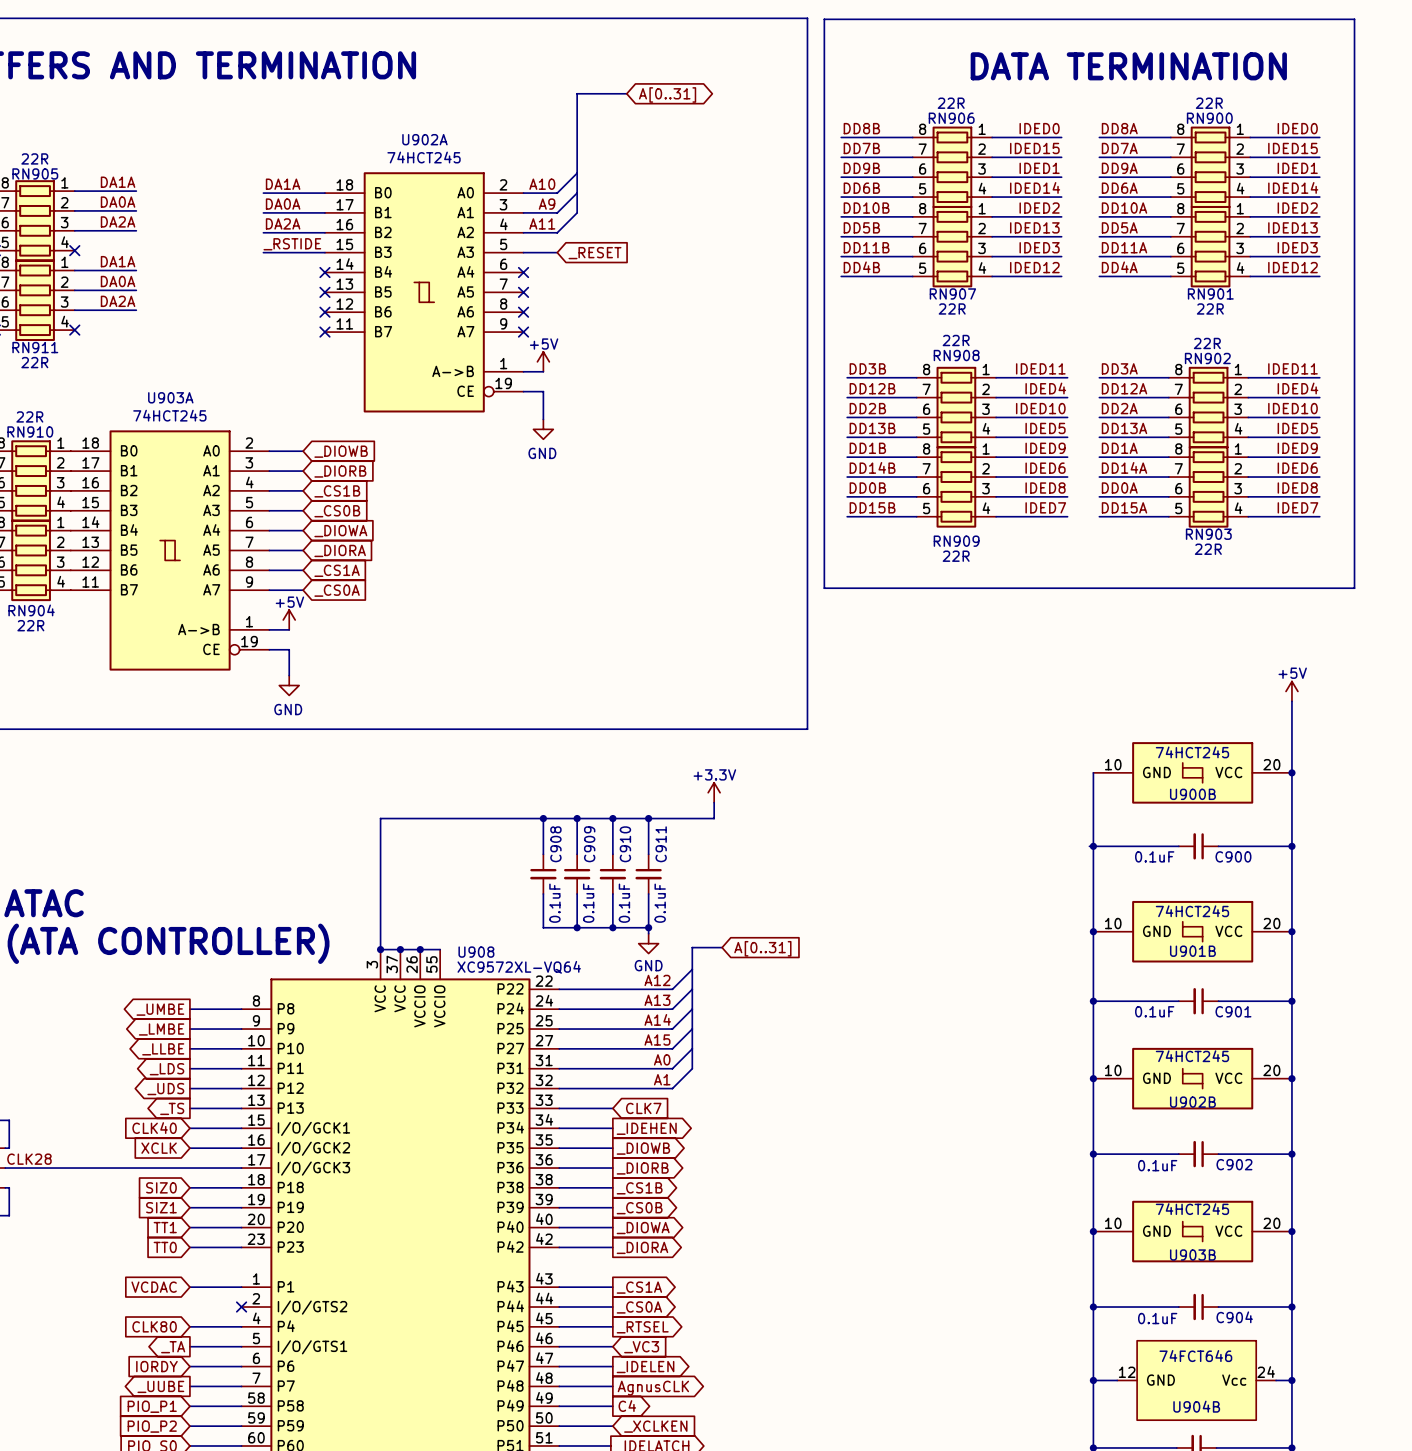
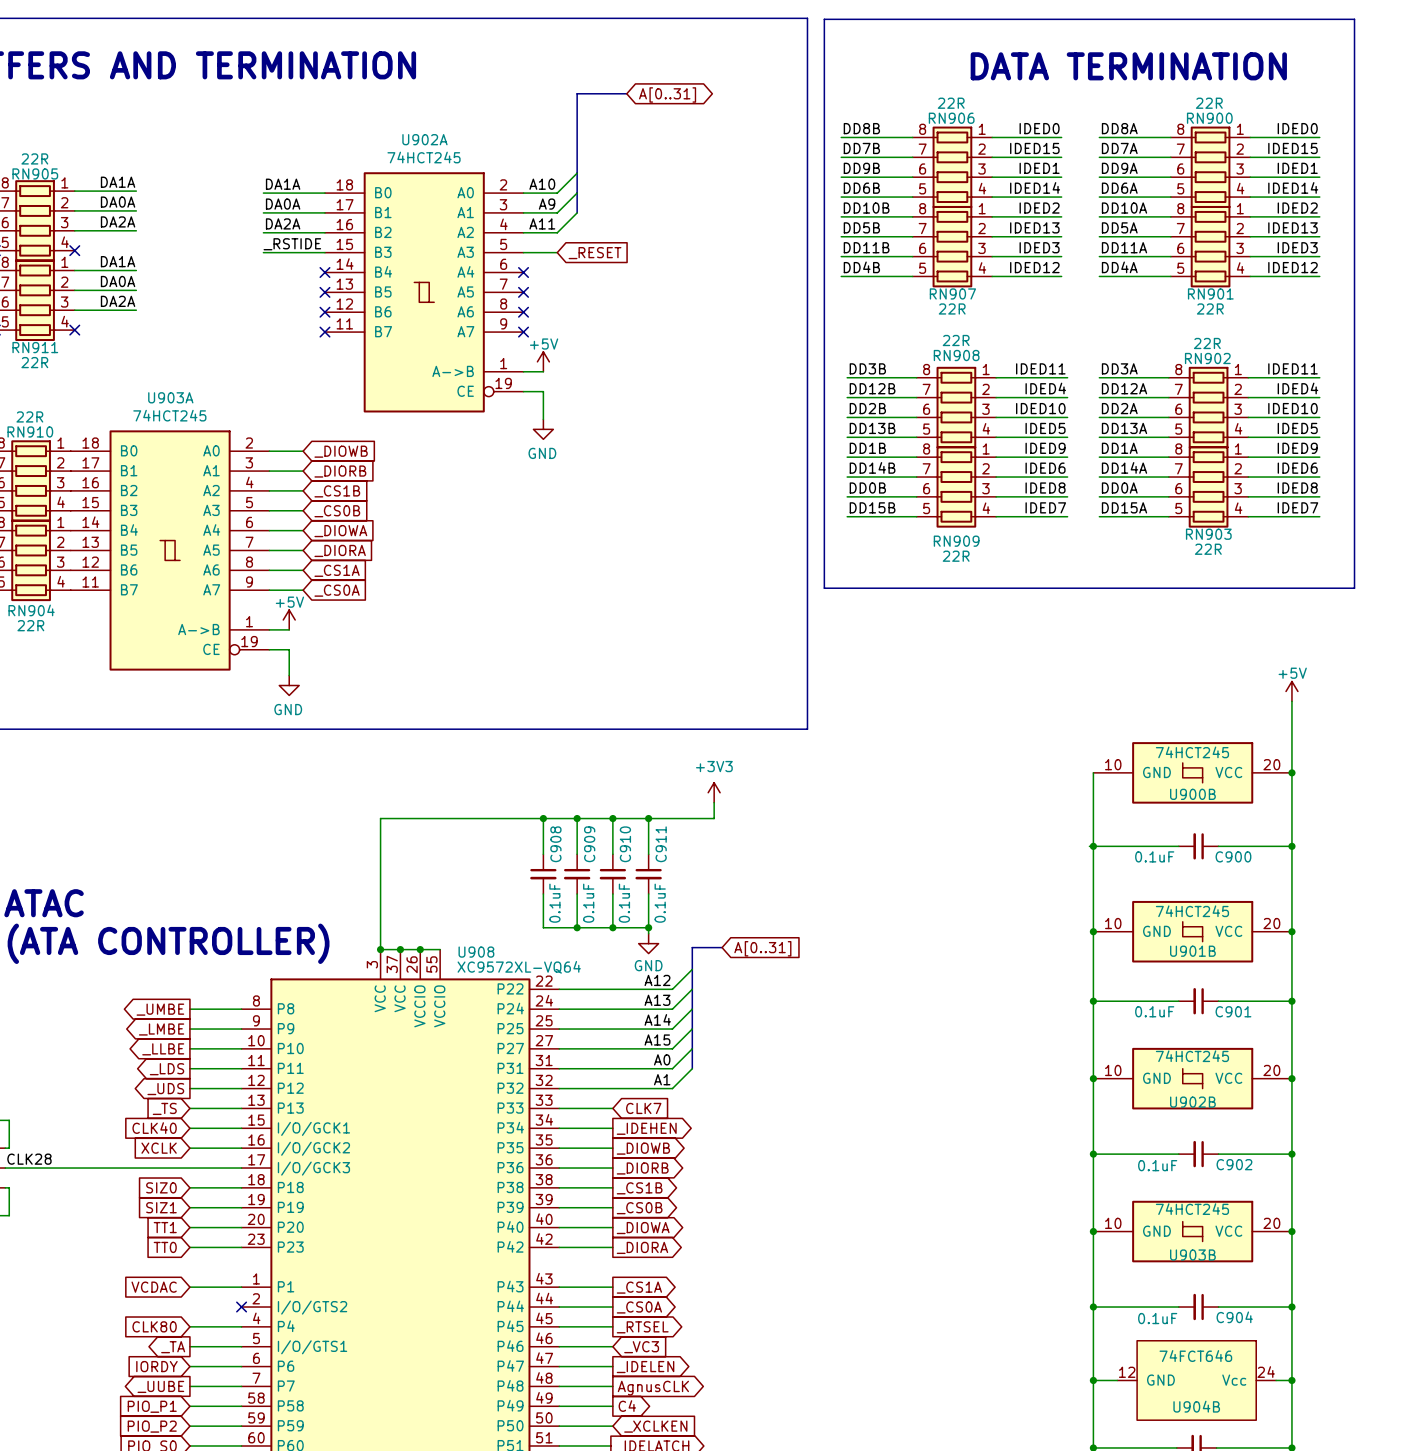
power symbol: +3.3V (714, 792) -> +3V3 (714, 792)
global label shape: output (172, 1108) -> input (164, 1108)

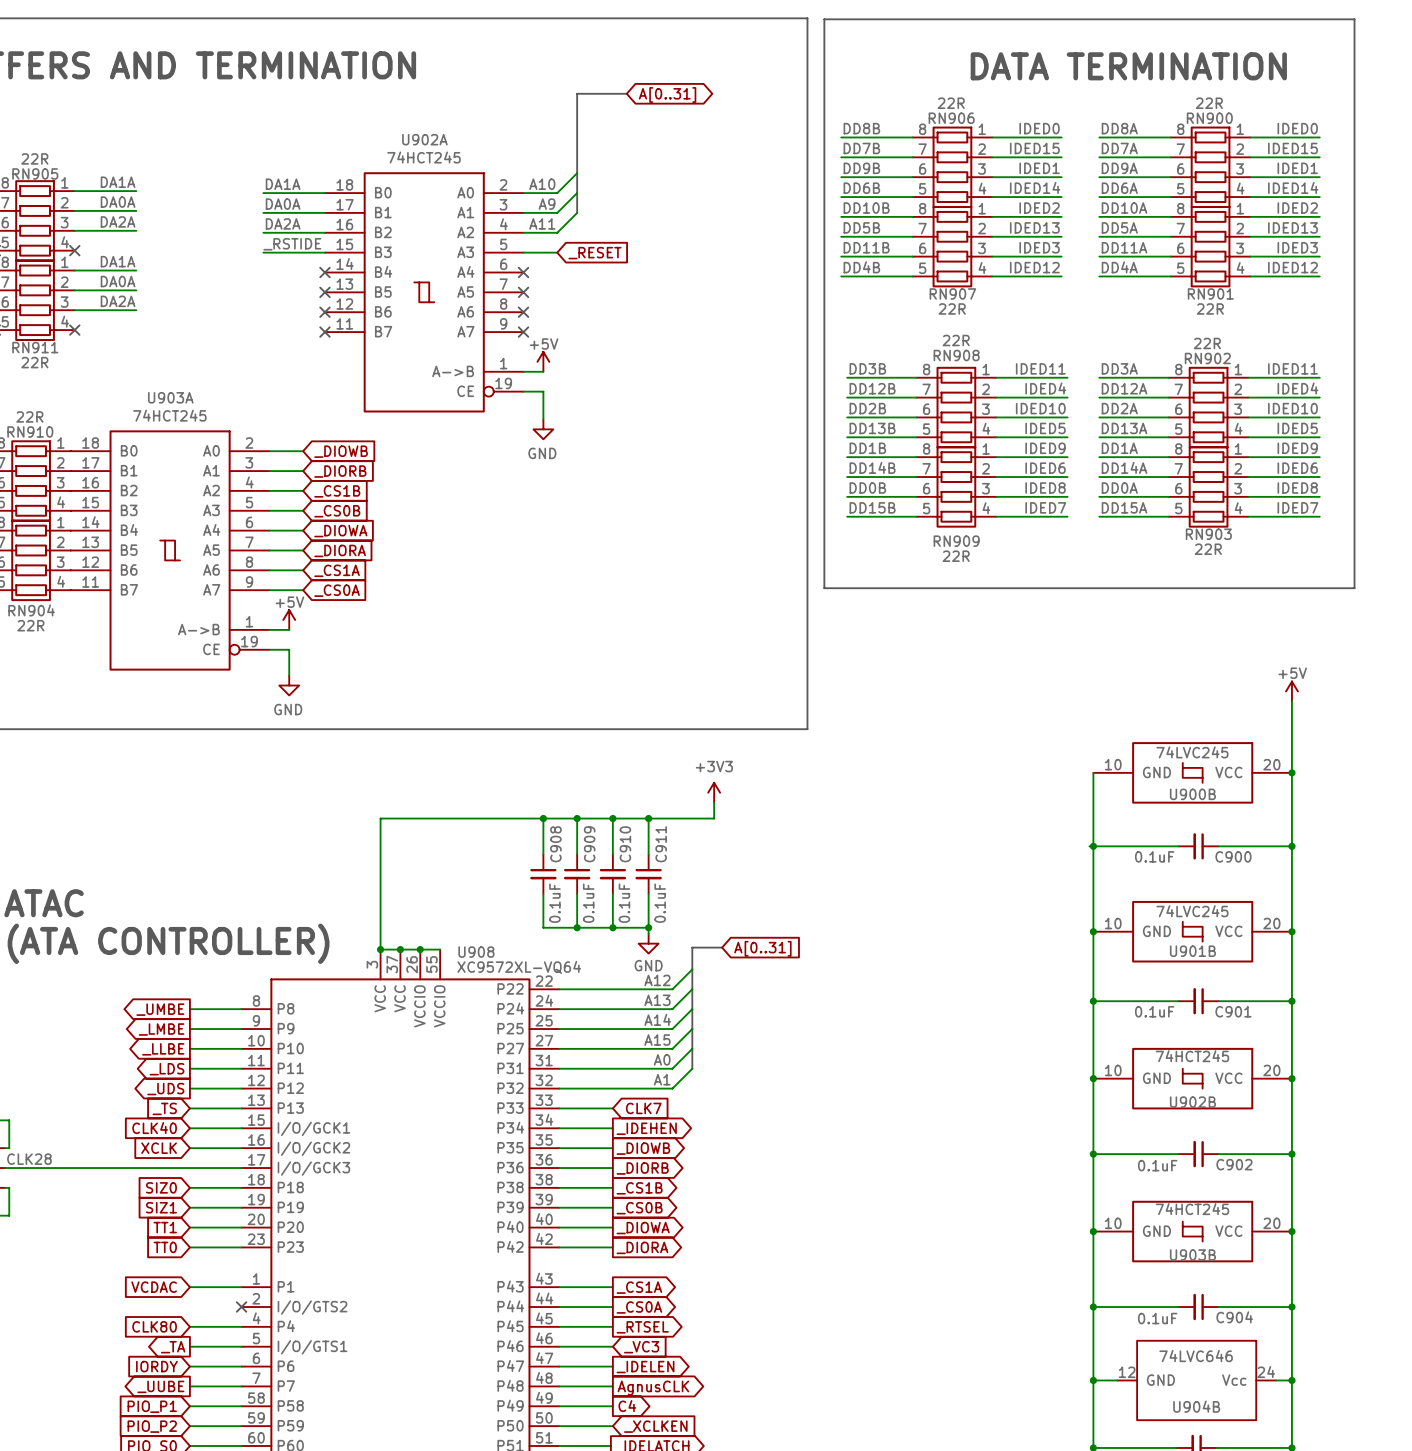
U900B value: 74HCT245 (1192, 752) -> 74LVC245 (1192, 752)
U901B value: 74HCT245 (1192, 911) -> 74LVC245 (1192, 911)
U904B value: 74FCT646 (1195, 1356) -> 74LVC646 (1196, 1356)

